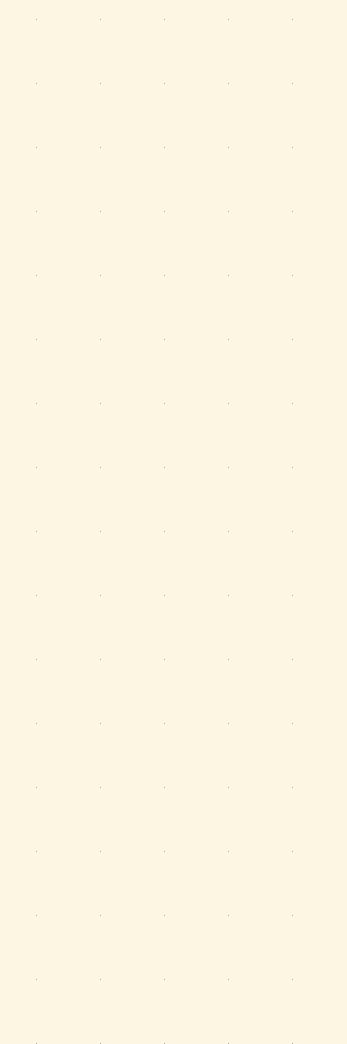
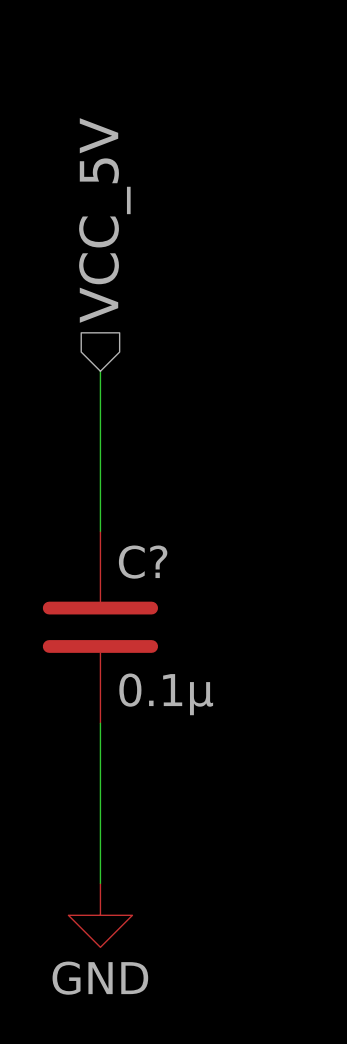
hierarchical label: none -> VCC_5V (104, 220)
wire: none -> (100, 371) (100, 531)
C?: none -> 0.1μ (100, 627)
wire: none -> (100, 723) (100, 883)
power symbol: none -> GND (100, 915)

